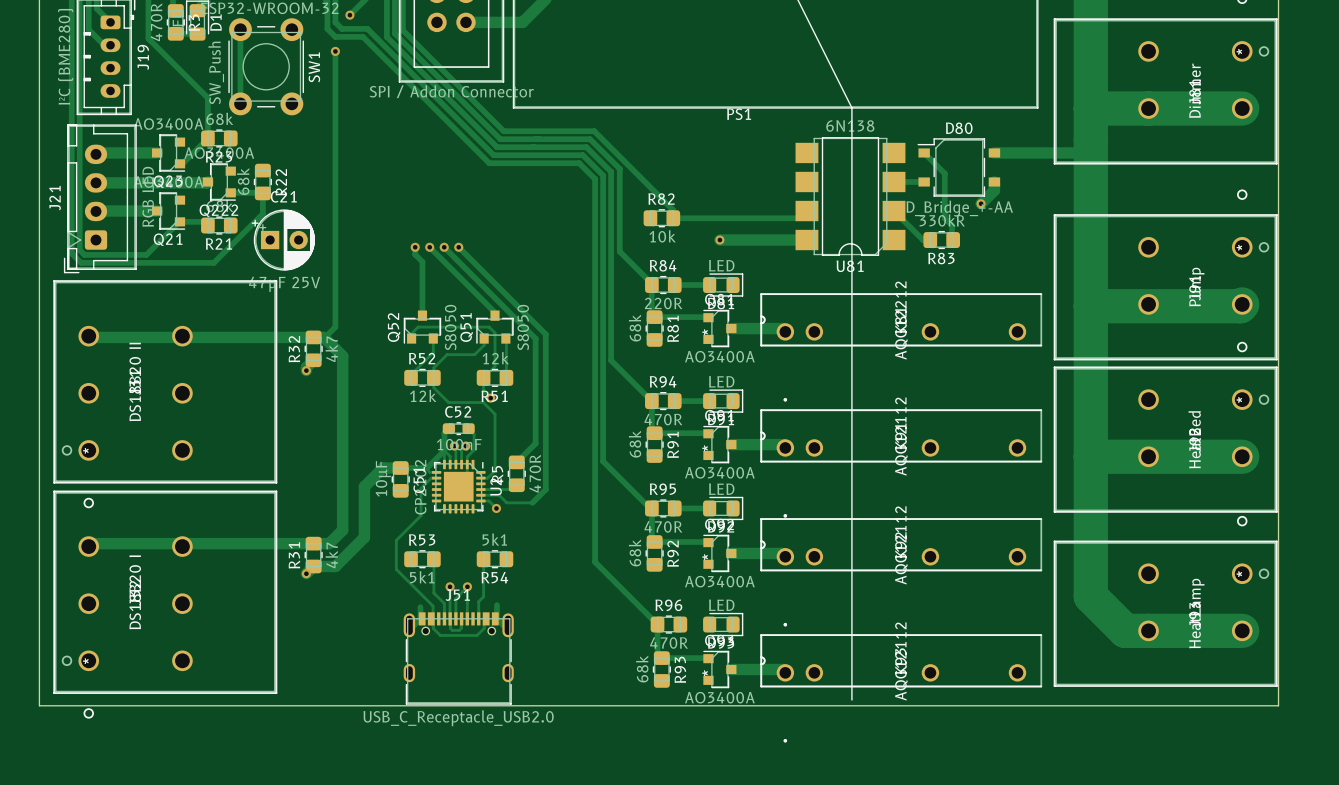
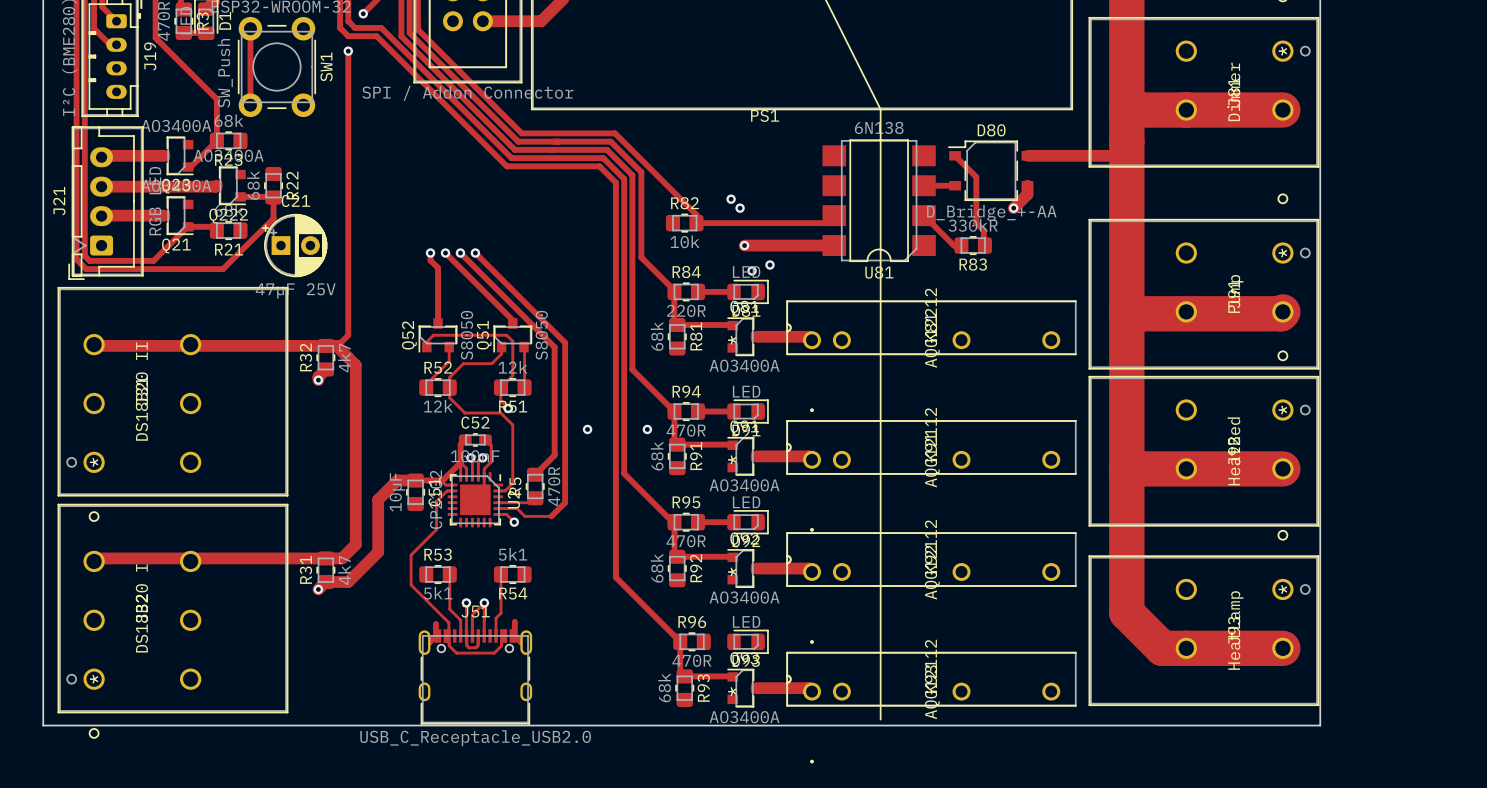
via: none -> (731, 199)
via: none -> (740, 208)
via: none -> (769, 264)
via: none -> (752, 270)
via: none -> (587, 429)
via: none -> (647, 429)

